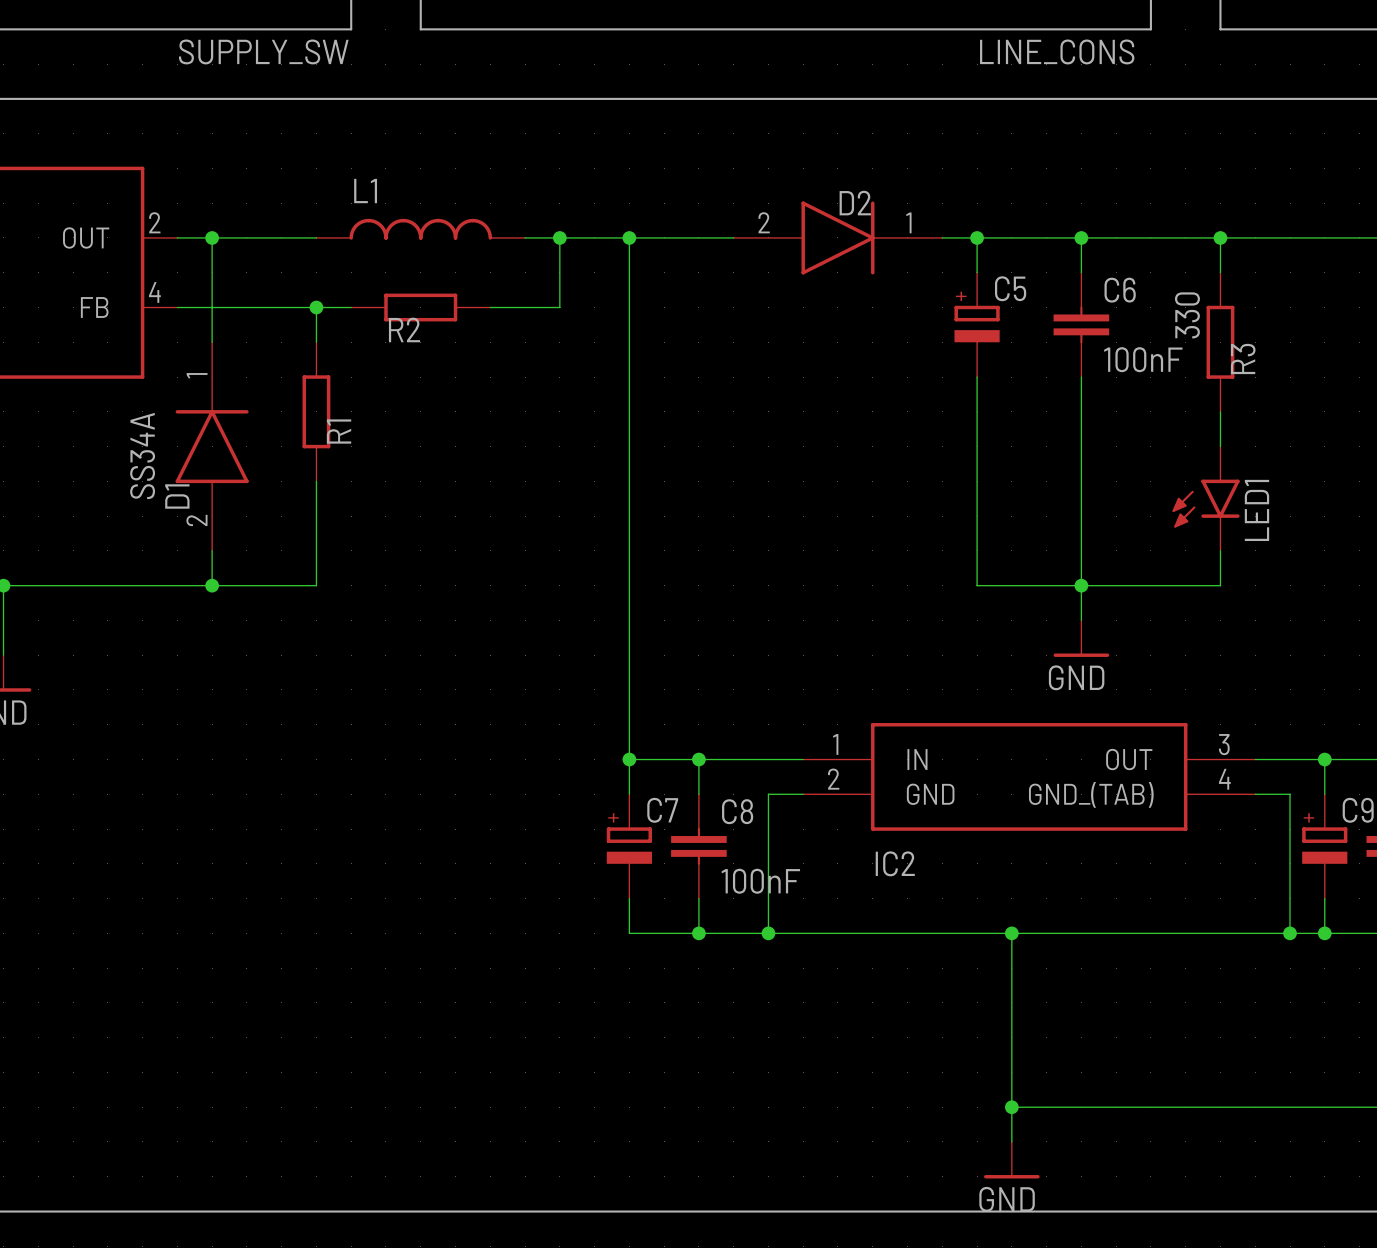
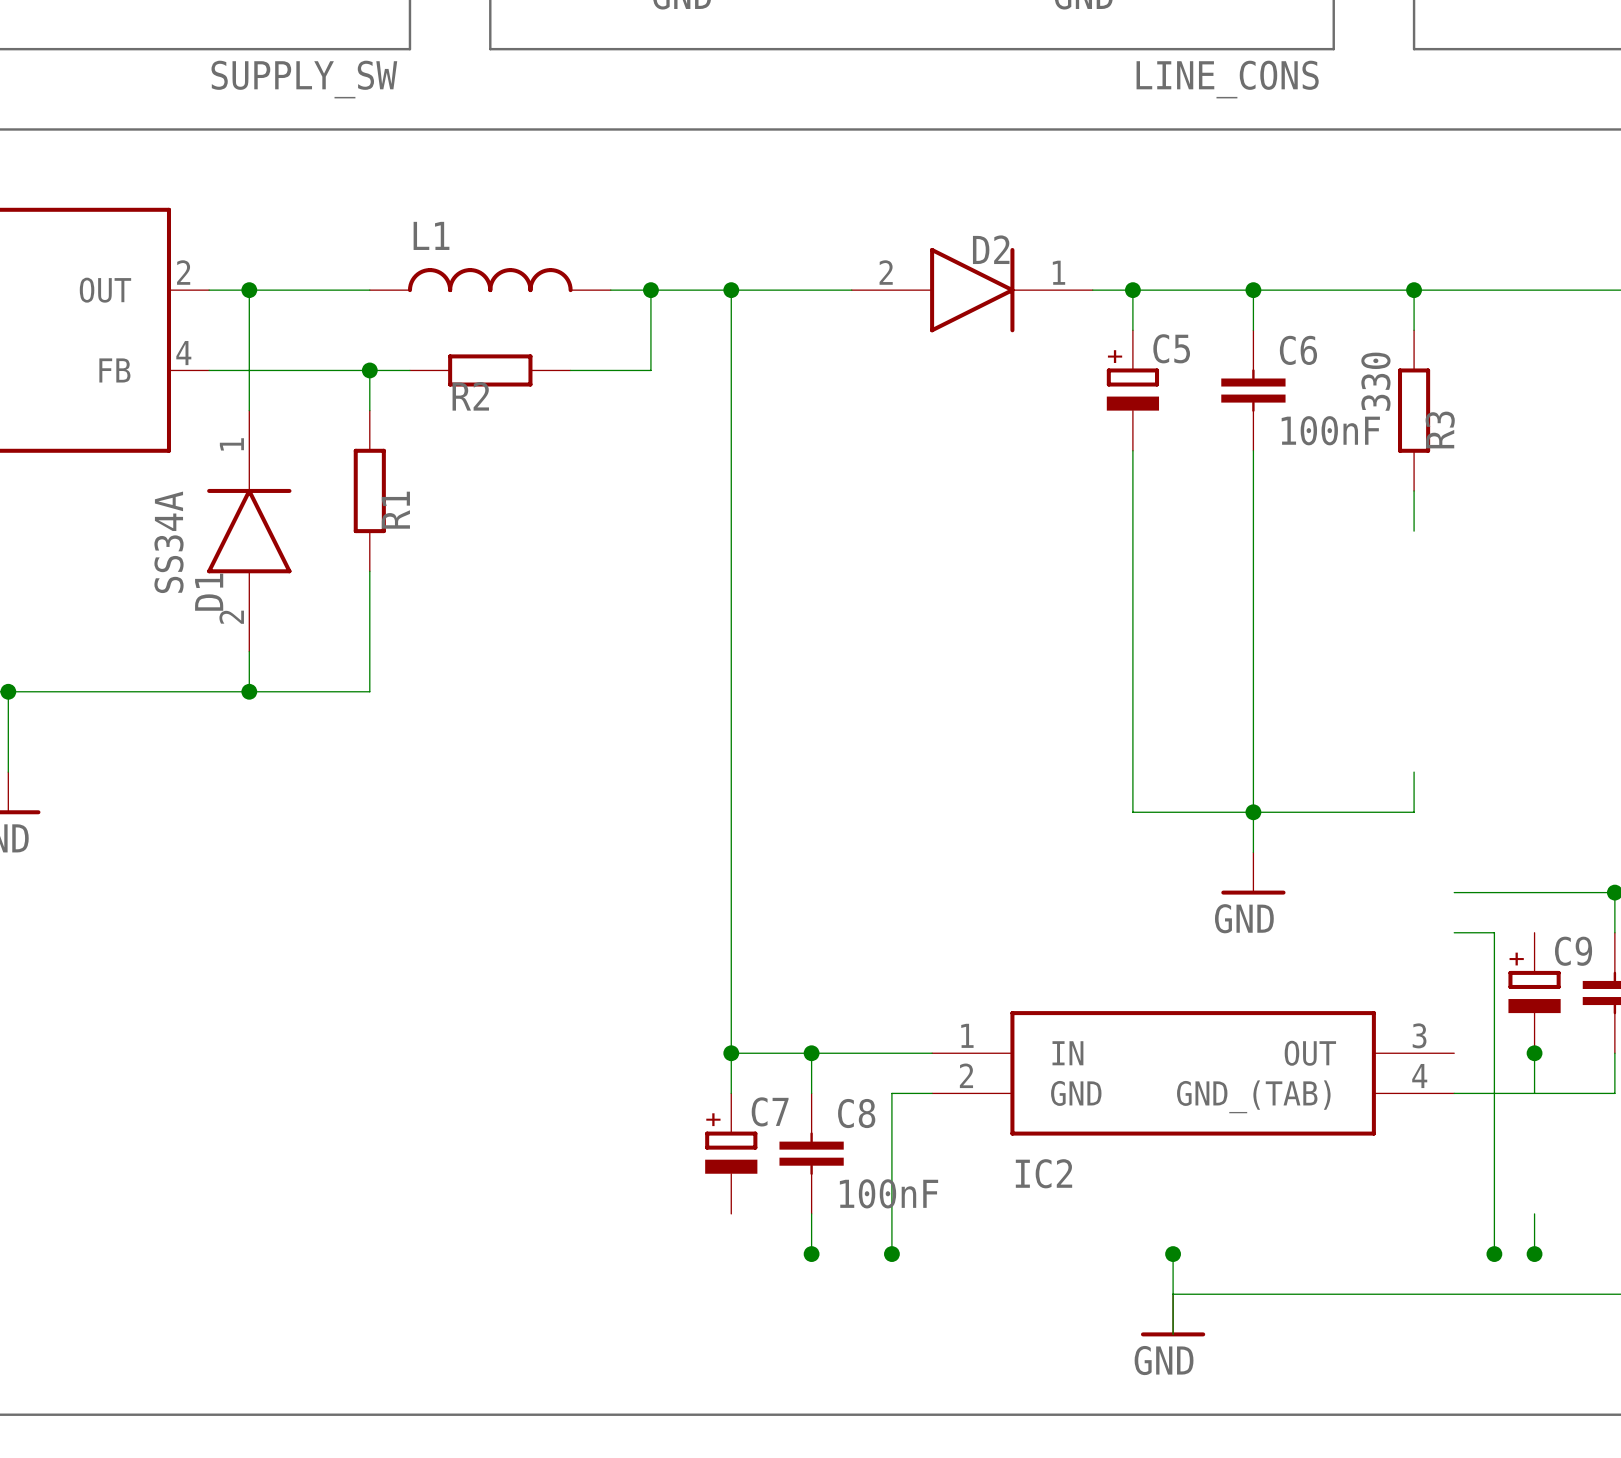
LED1: (1206, 498) -> none
wire: (1220, 550) (1220, 585) (977, 585) -> (1414, 772) (1414, 812) (1132, 812) (1132, 691)
junction: (1081, 585) -> none
wire: none -> (1253, 731) (1253, 852)
power symbol position: GND (1081, 638) -> GND (1253, 873)
junction: none -> (1253, 812)
wire: (629, 759) (803, 759) -> none
junction: (629, 759) -> none
wire: (698, 759) (698, 794) -> (811, 1213) (811, 1254)
junction: (698, 759) -> none
wire: (1324, 759) (1324, 794) -> (1534, 1213) (1534, 1254)
junction: (1324, 759) -> none
IC2 position: (1029, 776) -> (1193, 1073)
wire: none -> (731, 932) (731, 1053) (932, 1053)
wire: (803, 794) (768, 794) (768, 933) (629, 933) -> none
C7 position: (629, 846) -> (731, 1153)
C8 position: (698, 846) -> (811, 1153)
junction: none -> (731, 1053)
junction: none -> (1534, 1053)
junction position: (698, 933) -> (811, 1053)
junction: (768, 933) -> none
wire: (803, 933) (1255, 933) -> none
wire: (1011, 933) (1011, 1072) -> (891, 1093) (891, 1254)
junction: (1011, 933) -> none
wire: none -> (1494, 1093) (1494, 1254)
junction: (1290, 933) -> none
junction: (1324, 933) -> none
junction: none -> (811, 1254)
junction: none -> (891, 1254)
junction: none -> (1494, 1254)
junction: none -> (1534, 1254)
junction position: (1011, 1107) -> (1173, 1254)
power symbol position: GND (1011, 1160) -> GND (1173, 1315)

